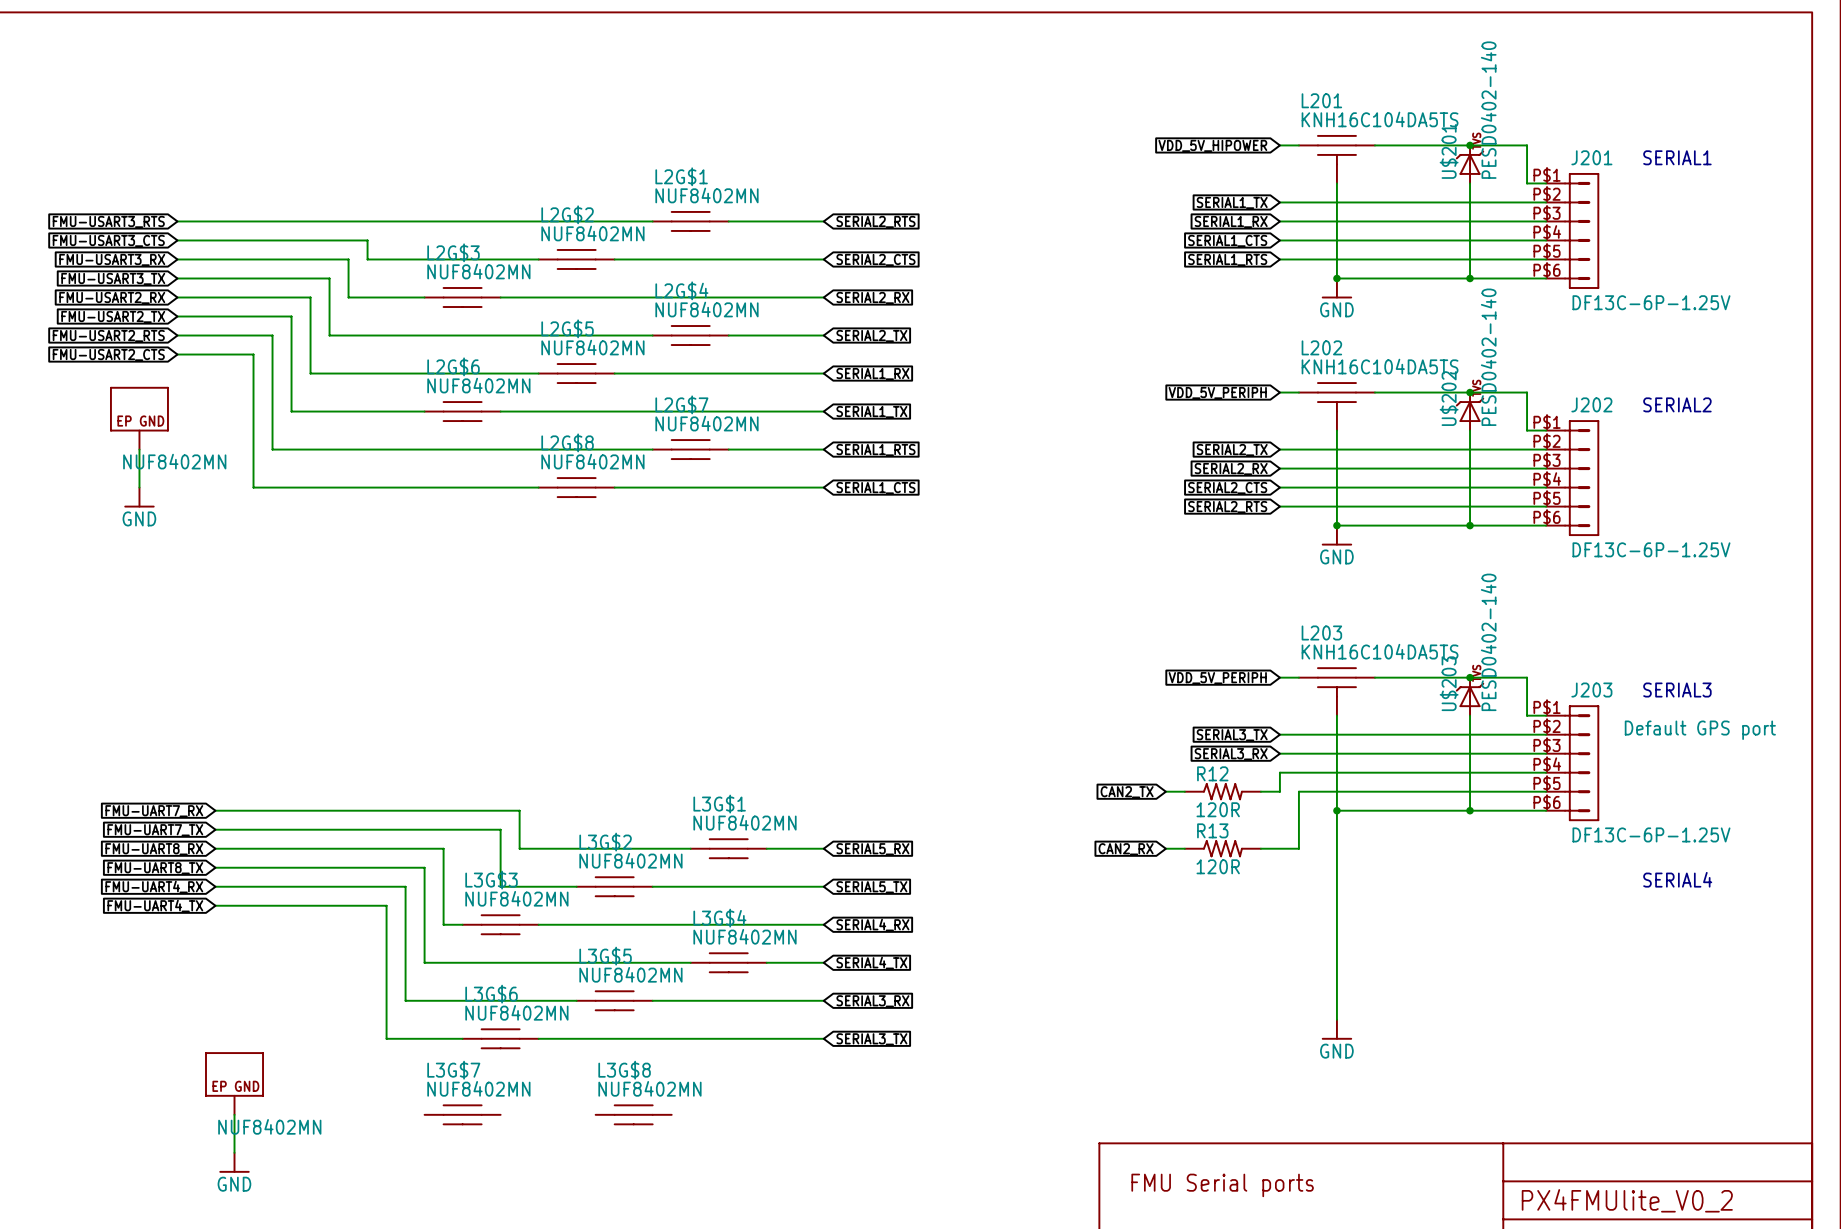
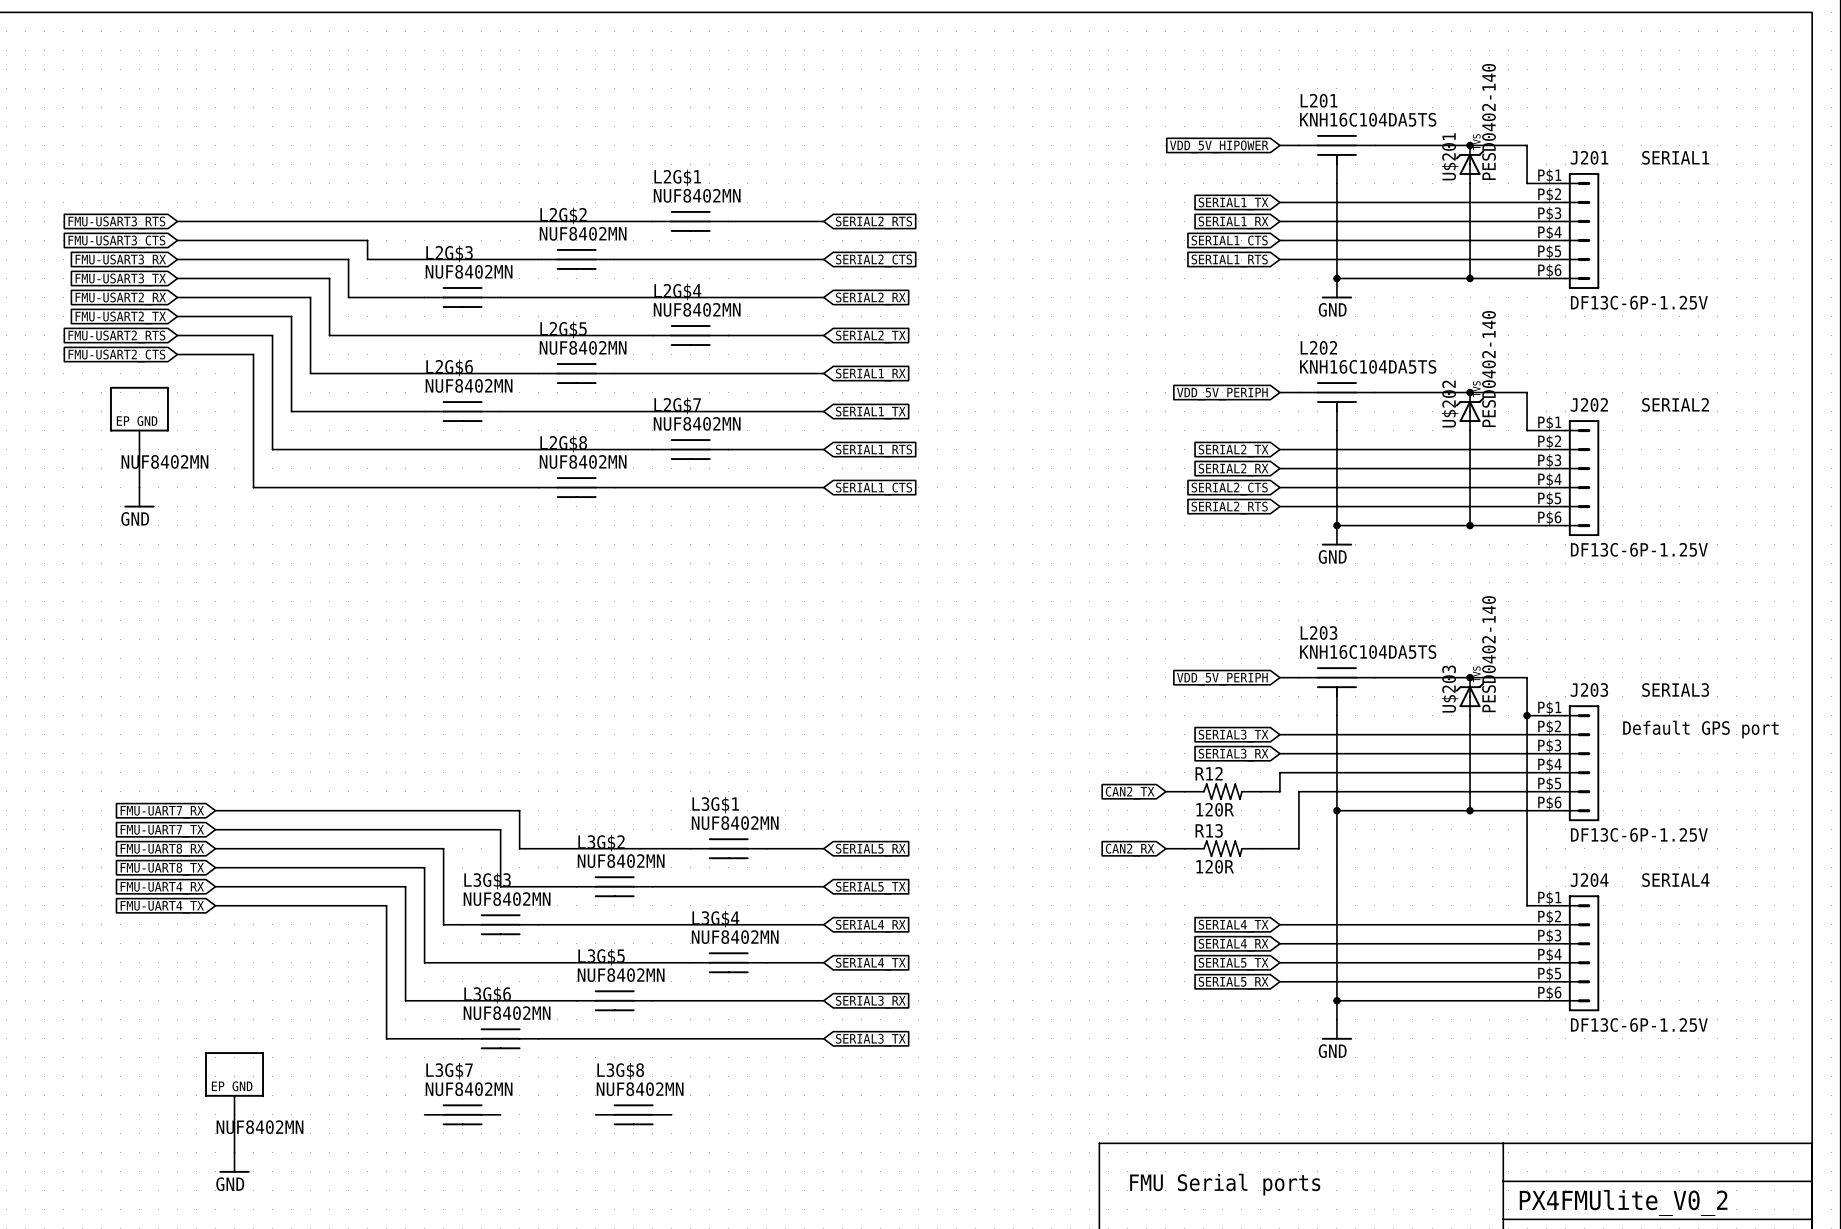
wire: none -> (1527, 715) (1527, 905) (1546, 905)
junction: none -> (1527, 715)
global label: none -> SERIAL4_TX (1233, 926)
wire: none -> (1279, 924) (1546, 924)
global label: none -> SERIAL4_RX (1233, 945)
wire: none -> (1279, 943) (1546, 943)
J204: none -> DF13C-6P-1.25V (1572, 953)
wire: none -> (1279, 962) (1546, 962)
global label: none -> SERIAL5_TX (1233, 964)
wire: none -> (1279, 981) (1546, 981)
global label: none -> SERIAL5_RX (1233, 983)
wire: none -> (1336, 1000) (1546, 1000)
junction: none -> (1336, 1000)

